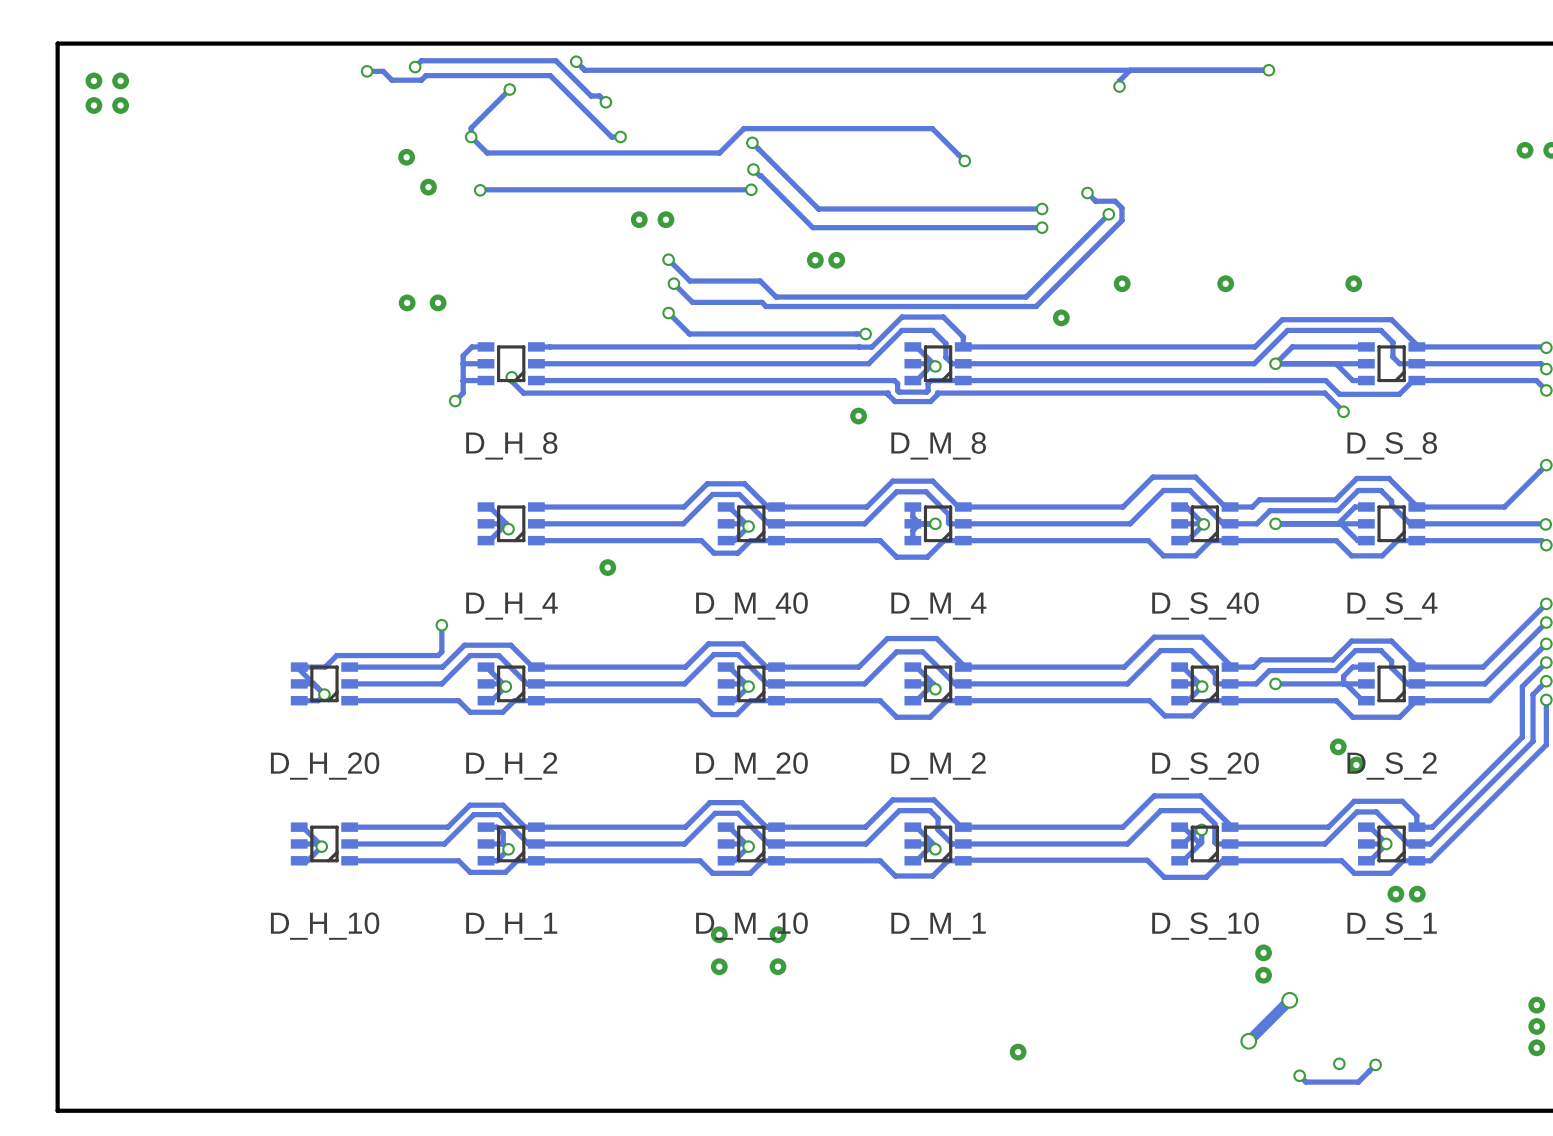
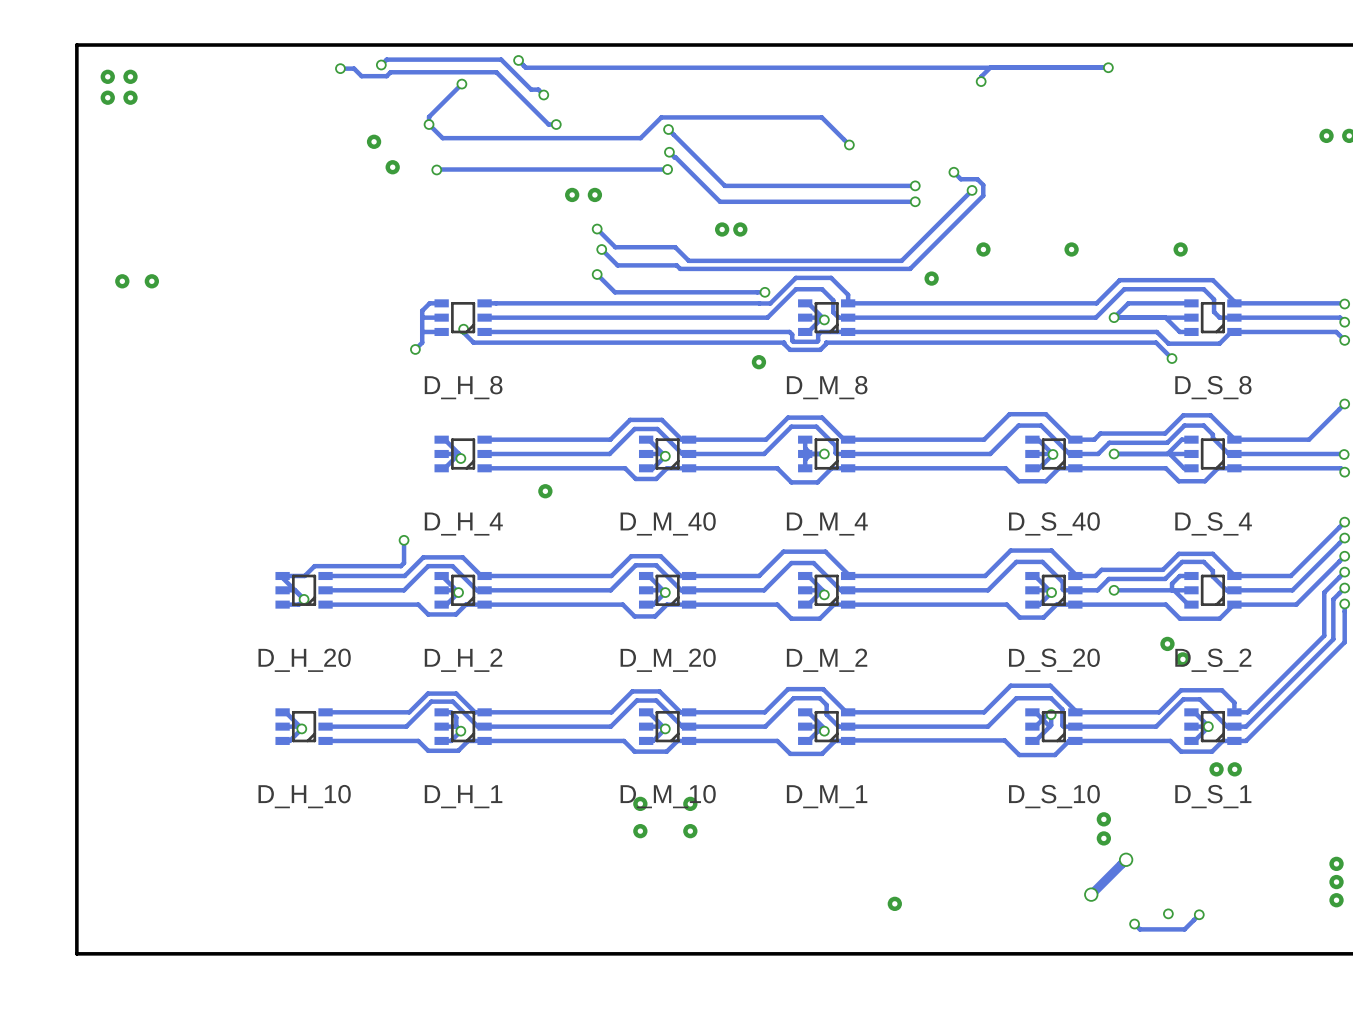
part: (407, 302) -> none
part: (438, 302) -> none
part: none -> (122, 281)
part: none -> (151, 281)

